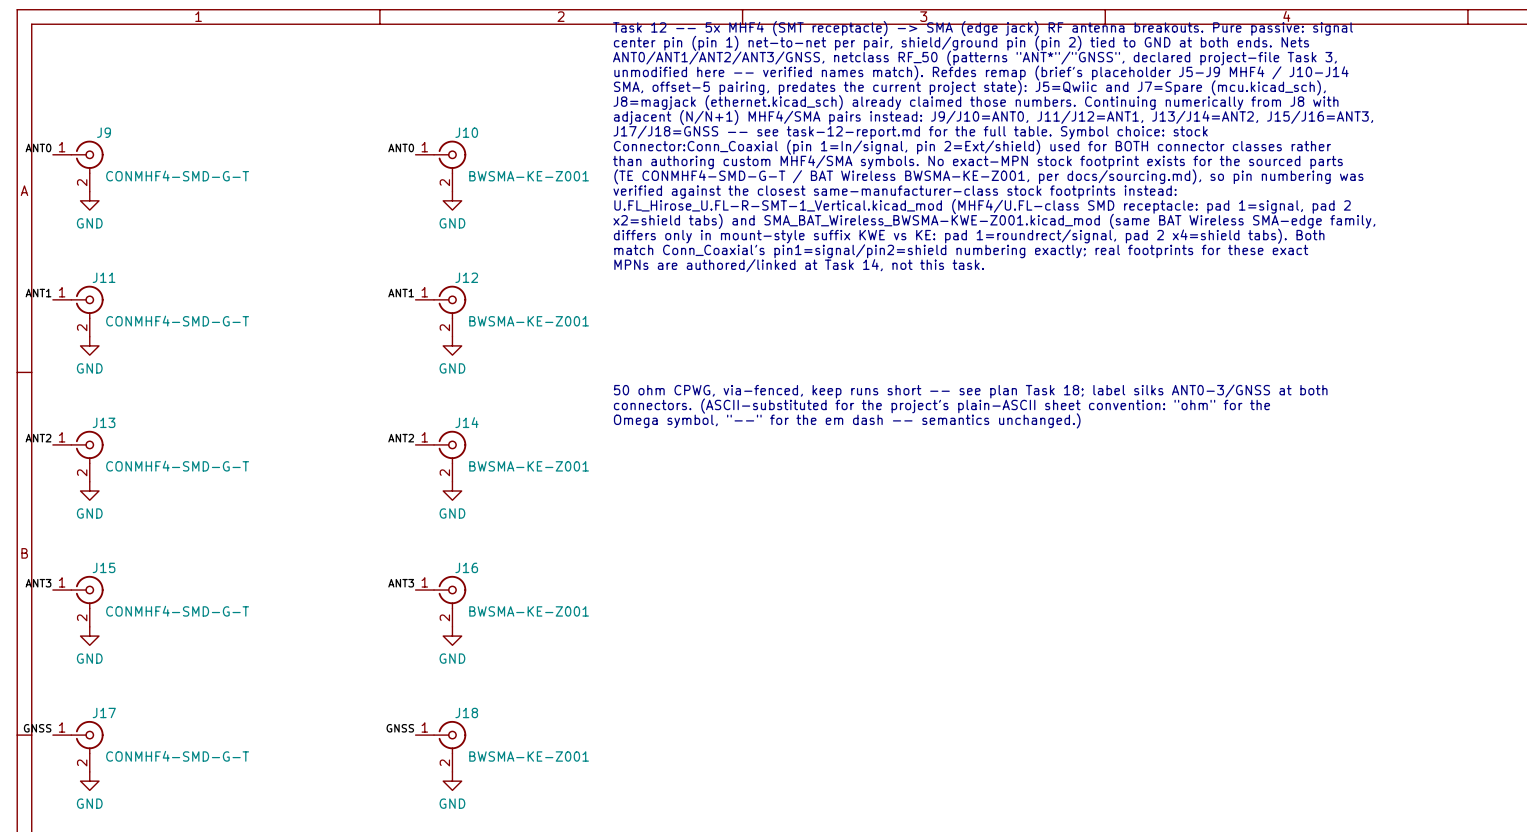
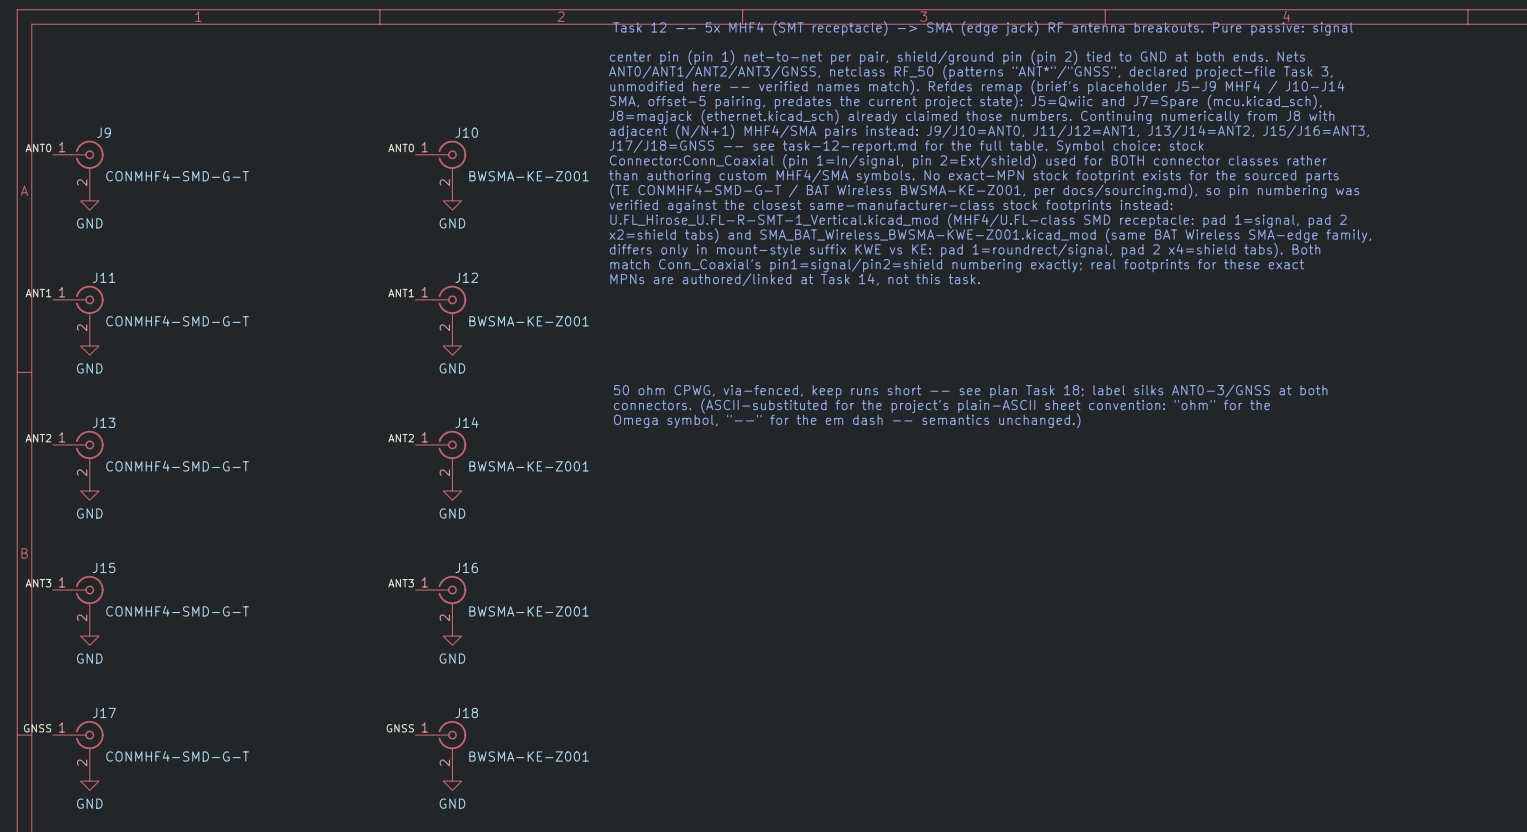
text position: center pin (pin 1) net-to-net per pair, shield/ground pin (pin 2) tied to GND at both ends. Nets (961, 43) -> center pin (pin 1) net-to-net per pair, shield/ground pin (pin 2) tied to GND at both ends. Nets (957, 57)
text position: ANT0/ANT1/ANT2/ANT3/GNSS, netclass RF_50 (patterns "ANT*"/"GNSS", declared project-file Task 3, (974, 58) -> ANT0/ANT1/ANT2/ANT3/GNSS, netclass RF_50 (patterns "ANT*"/"GNSS", declared project-file Task 3, (970, 72)
text position: unmodified here -- verified names match). Refdes remap (brief's placeholder J5-J9 MHF4 / J10-J14 (981, 73) -> unmodified here -- verified names match). Refdes remap (brief's placeholder J5-J9 MHF4 / J10-J14 (977, 87)
text position: SMA, offset-5 pairing, predates the current project state): J5=Qwiic and J7=Spare (mcu.kicad_sch), (969, 87) -> SMA, offset-5 pairing, predates the current project state): J5=Qwiic and J7=Spare (mcu.kicad_sch), (965, 102)
text position: J8=magjack (ethernet.kicad_sch) already claimed those numbers. Continuing numerically from J8 with (975, 102) -> J8=magjack (ethernet.kicad_sch) already claimed those numbers. Continuing numerically from J8 with (971, 117)
text position: adjacent (N/N+1) MHF4/SMA pairs instead: J9/J10=ANT0, J11/J12=ANT1, J13/J14=ANT2, J15/J16=ANT3, (993, 117) -> adjacent (N/N+1) MHF4/SMA pairs instead: J9/J10=ANT0, J11/J12=ANT1, J13/J14=ANT2, J15/J16=ANT3, (989, 131)
text position: J17/J18=GNSS -- see task-12-report.md for the full table. Symbol choice: stock (910, 132) -> J17/J18=GNSS -- see task-12-report.md for the full table. Symbol choice: stock (906, 146)
text position: Connector:Conn_Coaxial (pin 1=In/signal, pin 2=Ext/shield) used for BOTH connector classes rather (972, 147) -> Connector:Conn_Coaxial (pin 1=In/signal, pin 2=Ext/shield) used for BOTH connector classes rather (968, 161)
text position: than authoring custom MHF4/SMA symbols. No exact-MPN stock footprint exists for the sourced parts (977, 162) -> than authoring custom MHF4/SMA symbols. No exact-MPN stock footprint exists for the sourced parts (973, 176)
text position: (TE CONMHF4-SMD-G-T / BAT Wireless BWSMA-KE-Z001, per docs/sourcing.md), so pin numbering was (988, 176) -> (TE CONMHF4-SMD-G-T / BAT Wireless BWSMA-KE-Z001, per docs/sourcing.md), so pin numbering was (984, 191)
text position: verified against the closest same-manufacturer-class stock footprints instead: (895, 192) -> verified against the closest same-manufacturer-class stock footprints instead: (890, 206)
text position: U.FL_Hirose_U.FL-R-SMT-1_Vertical.kicad_mod (MHF4/U.FL-class SMD receptacle: pad 1=signal, pad 2 (982, 206) -> U.FL_Hirose_U.FL-R-SMT-1_Vertical.kicad_mod (MHF4/U.FL-class SMD receptacle: pad 1=signal, pad 2 (978, 220)
text position: x2=shield tabs) and SMA_BAT_Wireless_BWSMA-KWE-Z001.kicad_mod (same BAT Wireless SMA-edge family, (994, 221) -> x2=shield tabs) and SMA_BAT_Wireless_BWSMA-KWE-Z001.kicad_mod (same BAT Wireless SMA-edge family, (990, 235)
text position: differs only in mount-style suffix KWE vs KE: pad 1=roundrect/signal, pad 2 x4=shield tabs). Both (969, 236) -> differs only in mount-style suffix KWE vs KE: pad 1=roundrect/signal, pad 2 x4=shield tabs). Both (965, 250)
text position: match Conn_Coaxial's pin1=signal/pin2=shield numbering exactly; real footprints for these exact (961, 251) -> match Conn_Coaxial's pin1=signal/pin2=shield numbering exactly; real footprints for these exact (957, 265)
text position: MPNs are authored/linked at Task 14, not this task. (799, 265) -> MPNs are authored/linked at Task 14, not this task. (795, 279)

